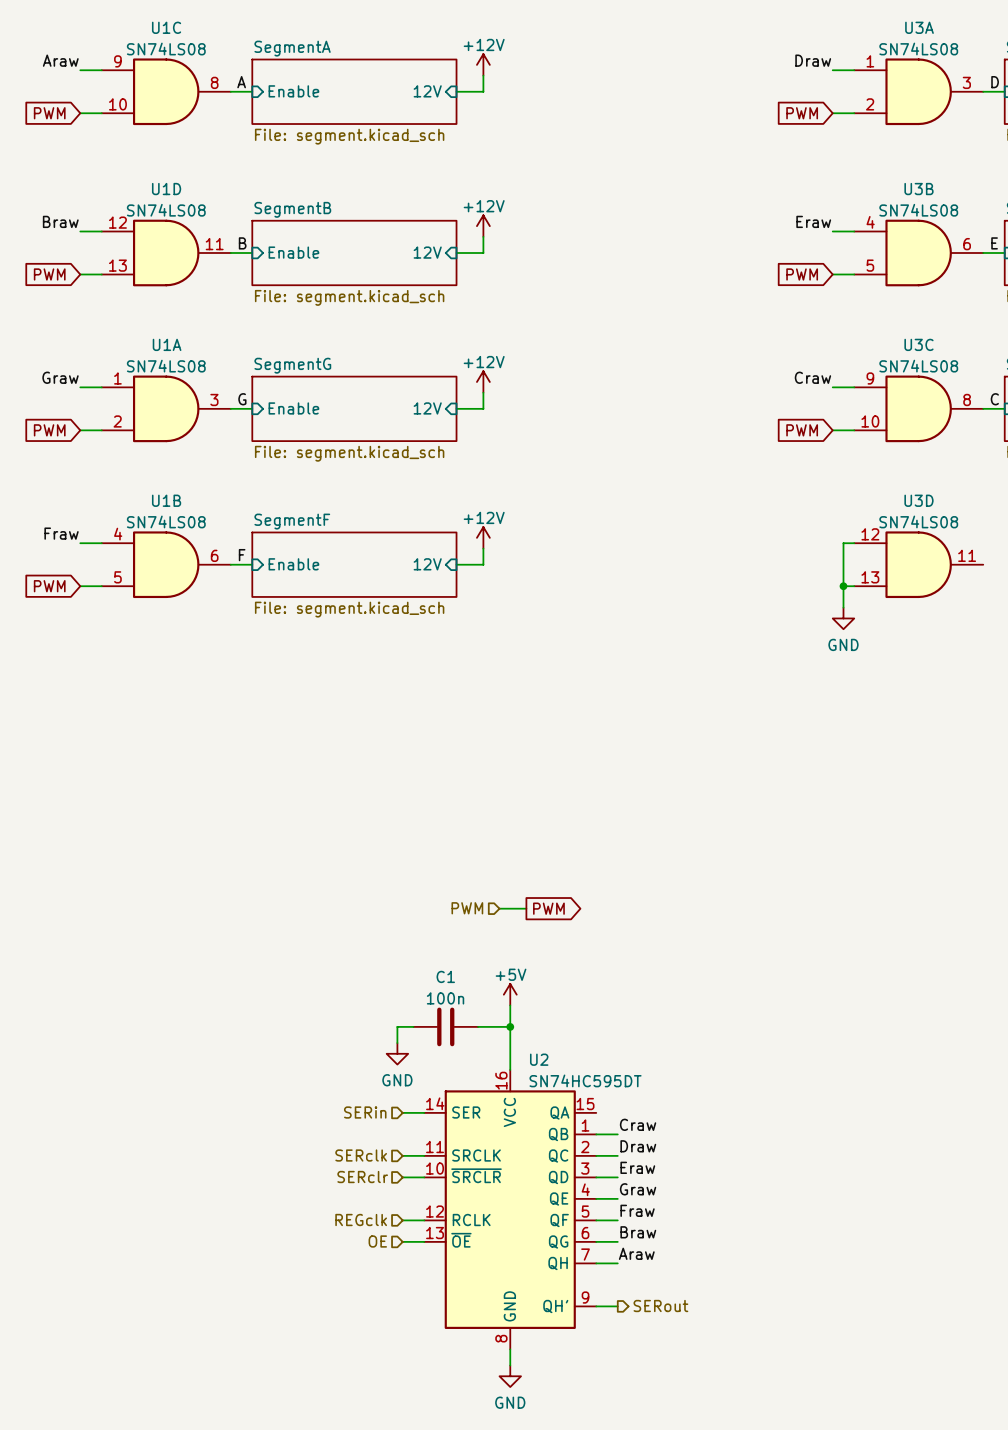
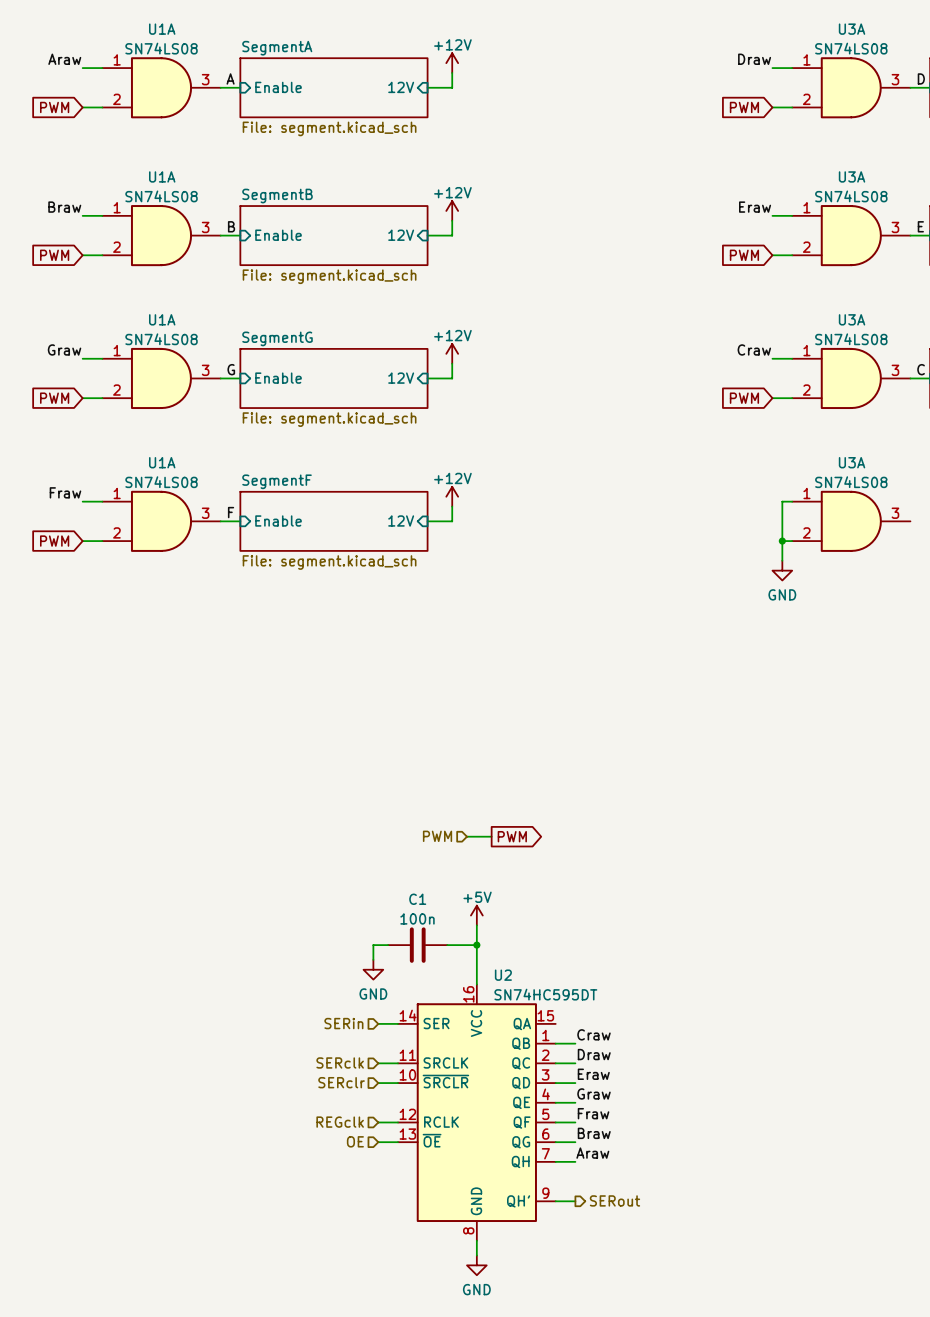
U1C: SN74LS08 (166, 91) -> none
U1A: none -> SN74LS08 (161, 87)
U1D: SN74LS08 (166, 252) -> none
U1A: none -> SN74LS08 (161, 235)
U3B: SN74LS08 (918, 252) -> none
U3A: none -> SN74LS08 (851, 235)
U3C: SN74LS08 (918, 408) -> none
U3A: none -> SN74LS08 (851, 378)
U1B: SN74LS08 (166, 564) -> none
U1A: none -> SN74LS08 (161, 521)
U3D: SN74LS08 (918, 564) -> none
U3A: none -> SN74LS08 (851, 521)

